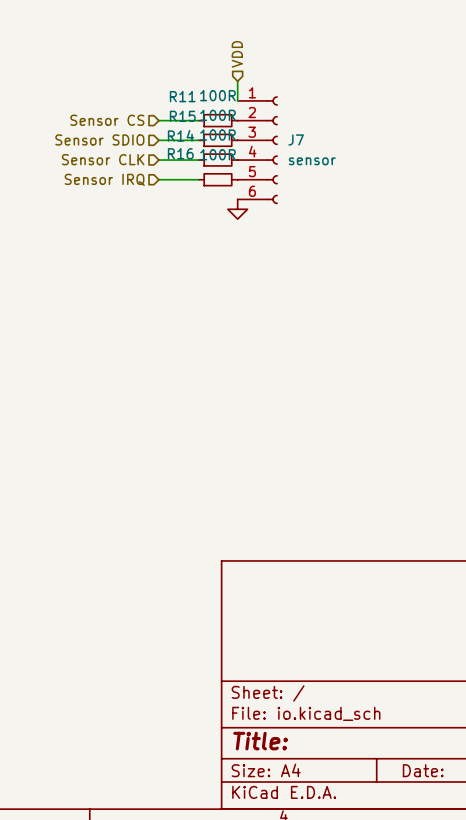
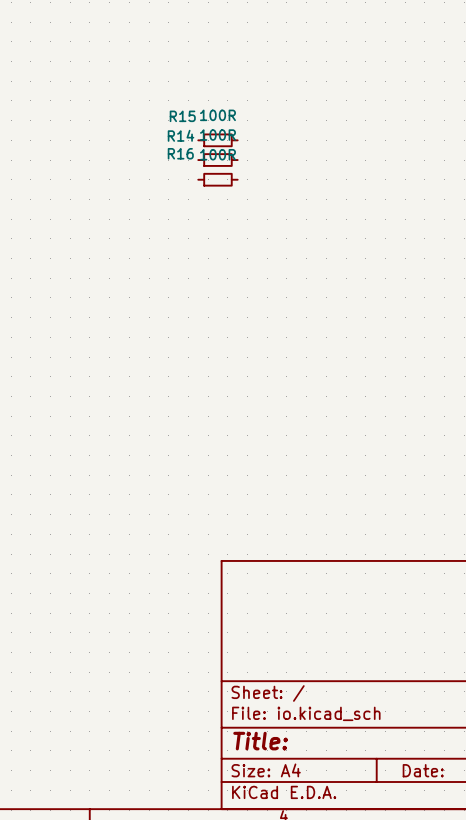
hierarchical label: VDD (237, 54) -> none
wire: (237, 81) (237, 100) -> none
hierarchical label: Sensor CS (107, 120) -> none
wire: (158, 120) (198, 120) -> none
R11: 100R (217, 120) -> none
hierarchical label: Sensor SDIO (99, 139) -> none
wire: (158, 140) (198, 140) -> none
J7: sensor (257, 150) -> none
hierarchical label: Sensor CLK (103, 159) -> none
wire: (158, 160) (198, 160) -> none
hierarchical label: Sensor IRQ (104, 179) -> none
wire: (158, 179) (198, 179) -> none
power symbol: (237, 209) -> none

